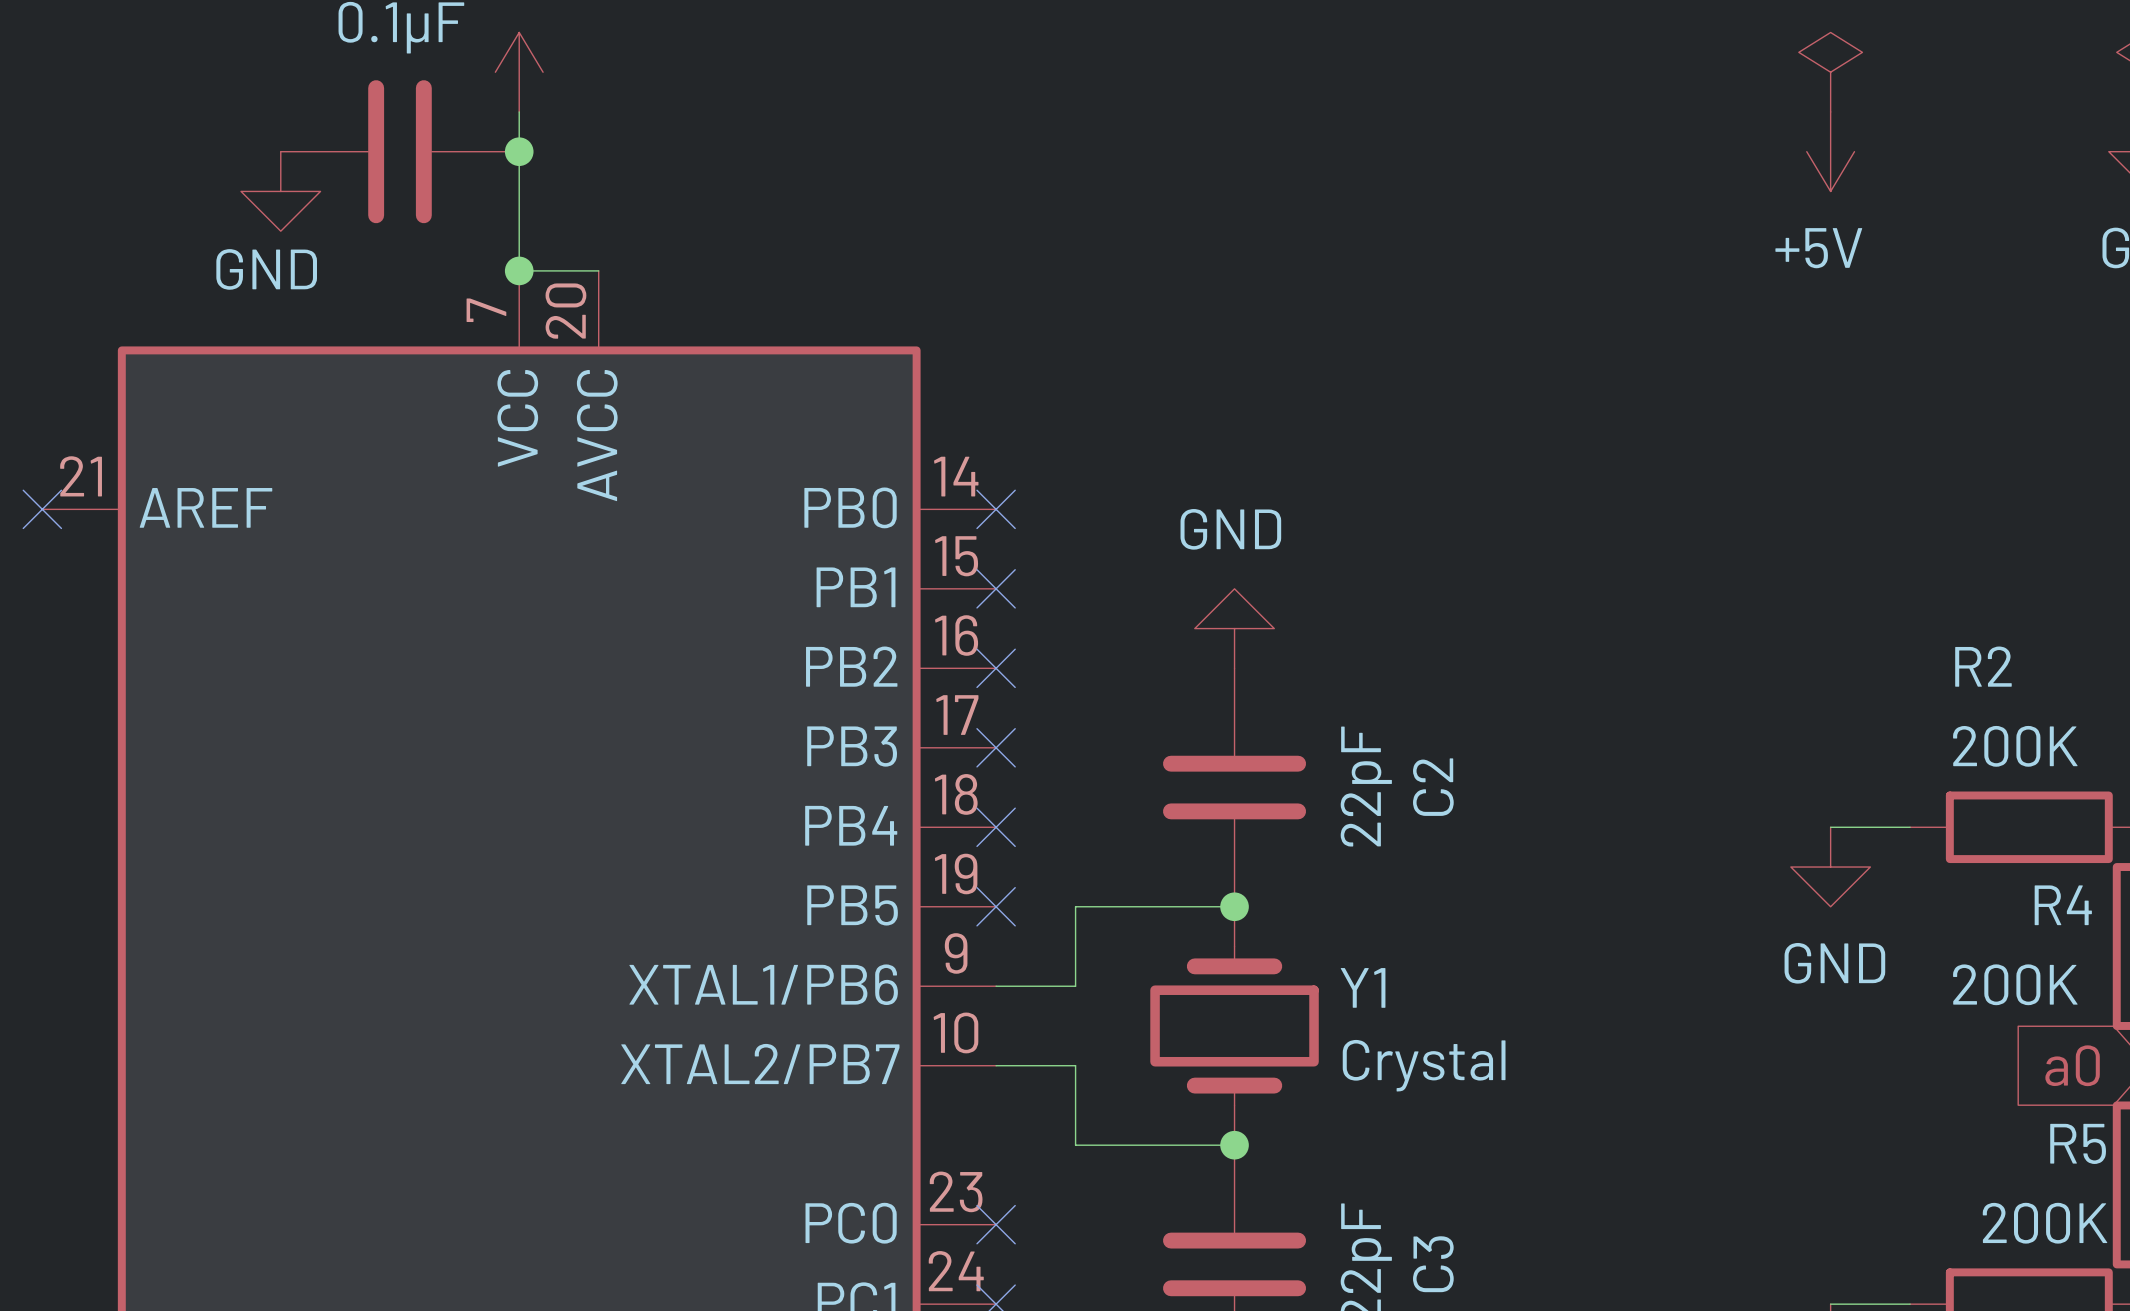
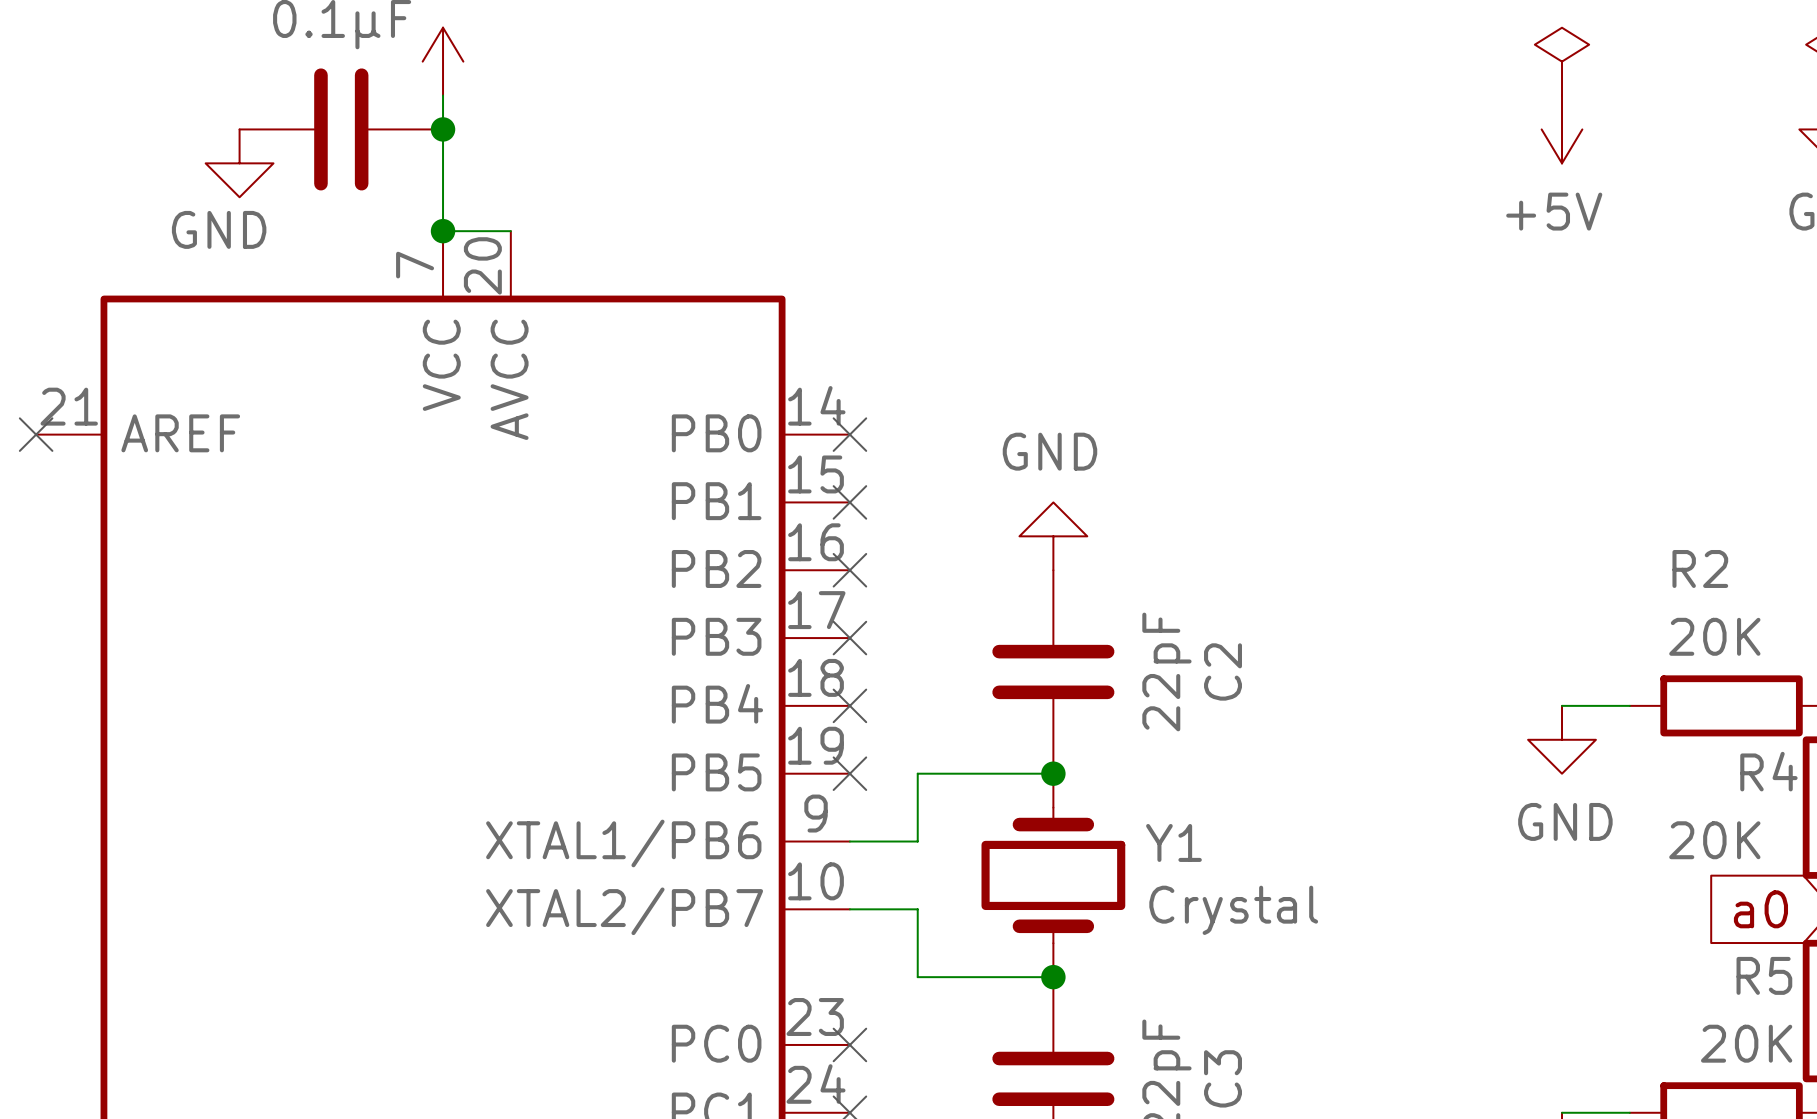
R2 value: 200K (2015, 746) -> 20K (1714, 636)
R4 value: 200K (2015, 984) -> 20K (1714, 840)
R5 value: 200K (2045, 1223) -> 20K (1746, 1043)

